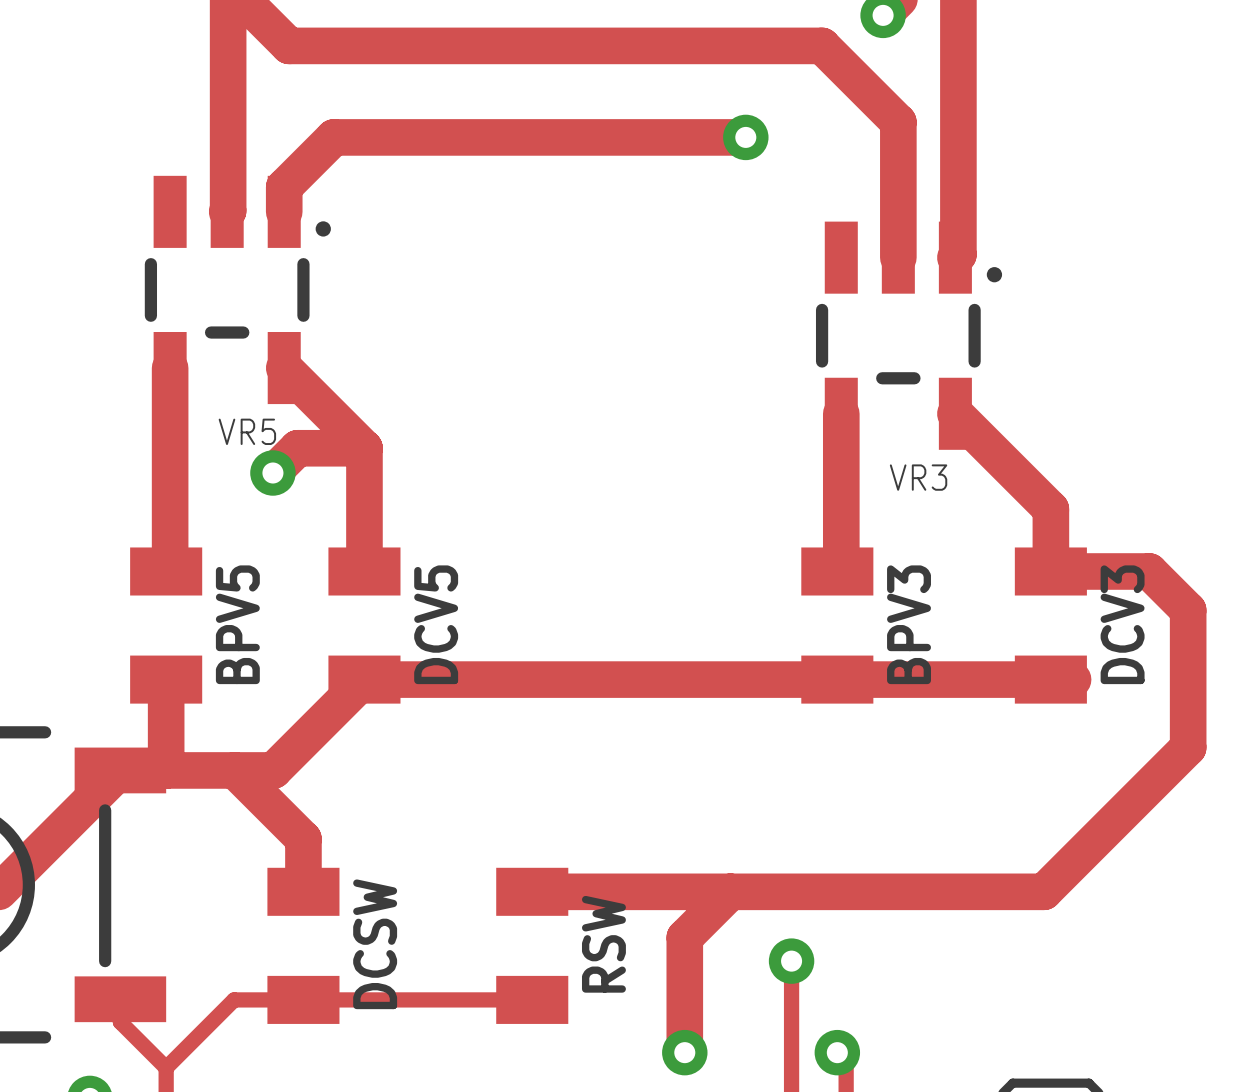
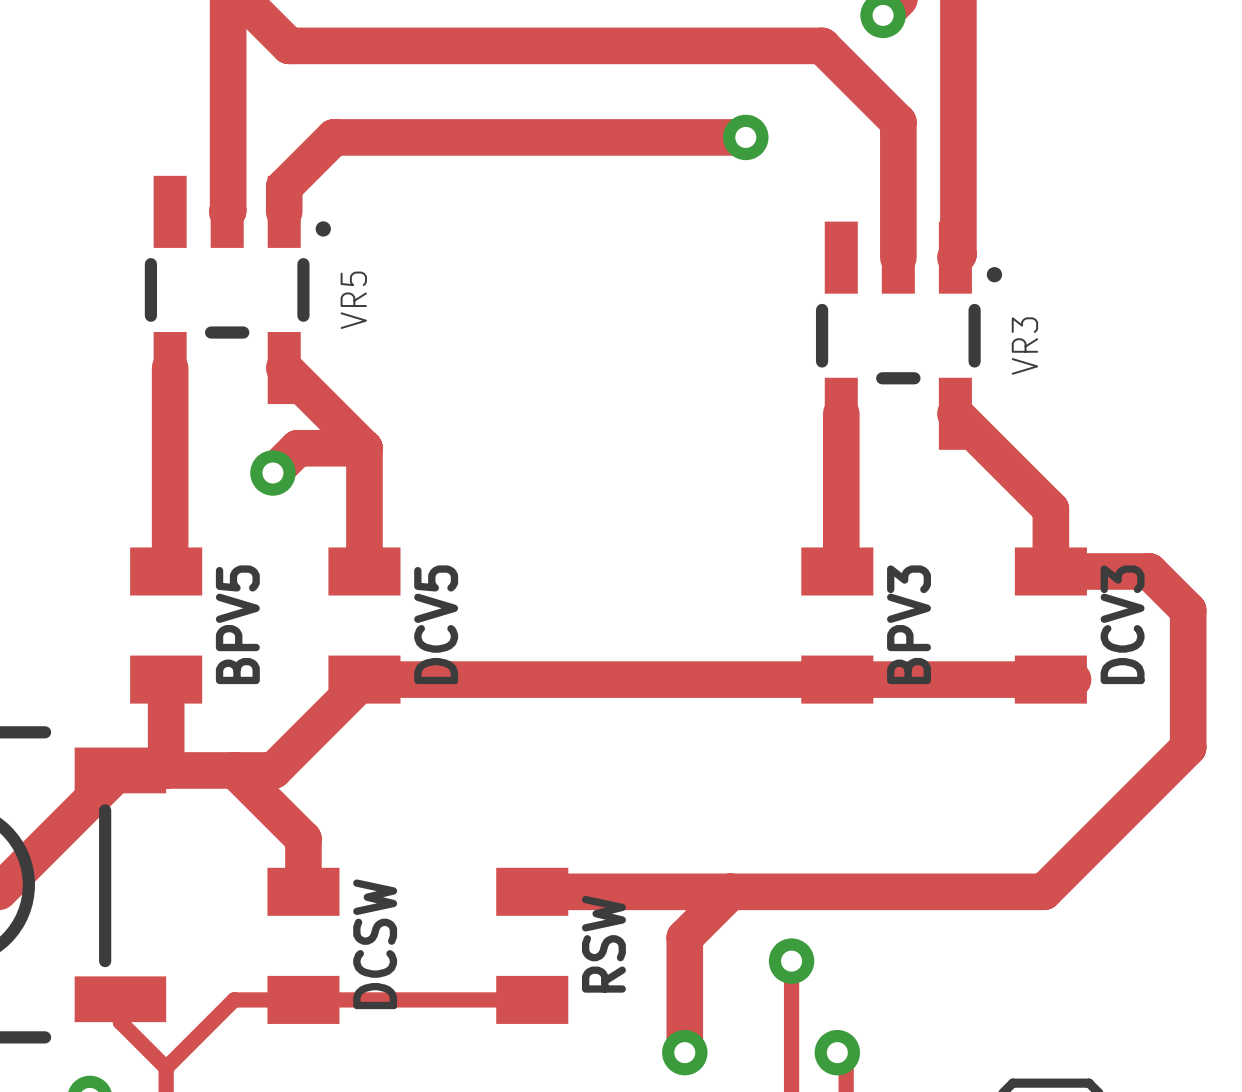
VR5 name rotation: 0° (247, 431) -> 90° counterclockwise (353, 300)
VR5 name position: VR5 (247, 431) -> VR5 (353, 300)
VR3 name rotation: 0° (918, 477) -> 90° counterclockwise (1024, 346)
VR3 name position: VR3 (918, 477) -> VR3 (1024, 346)

